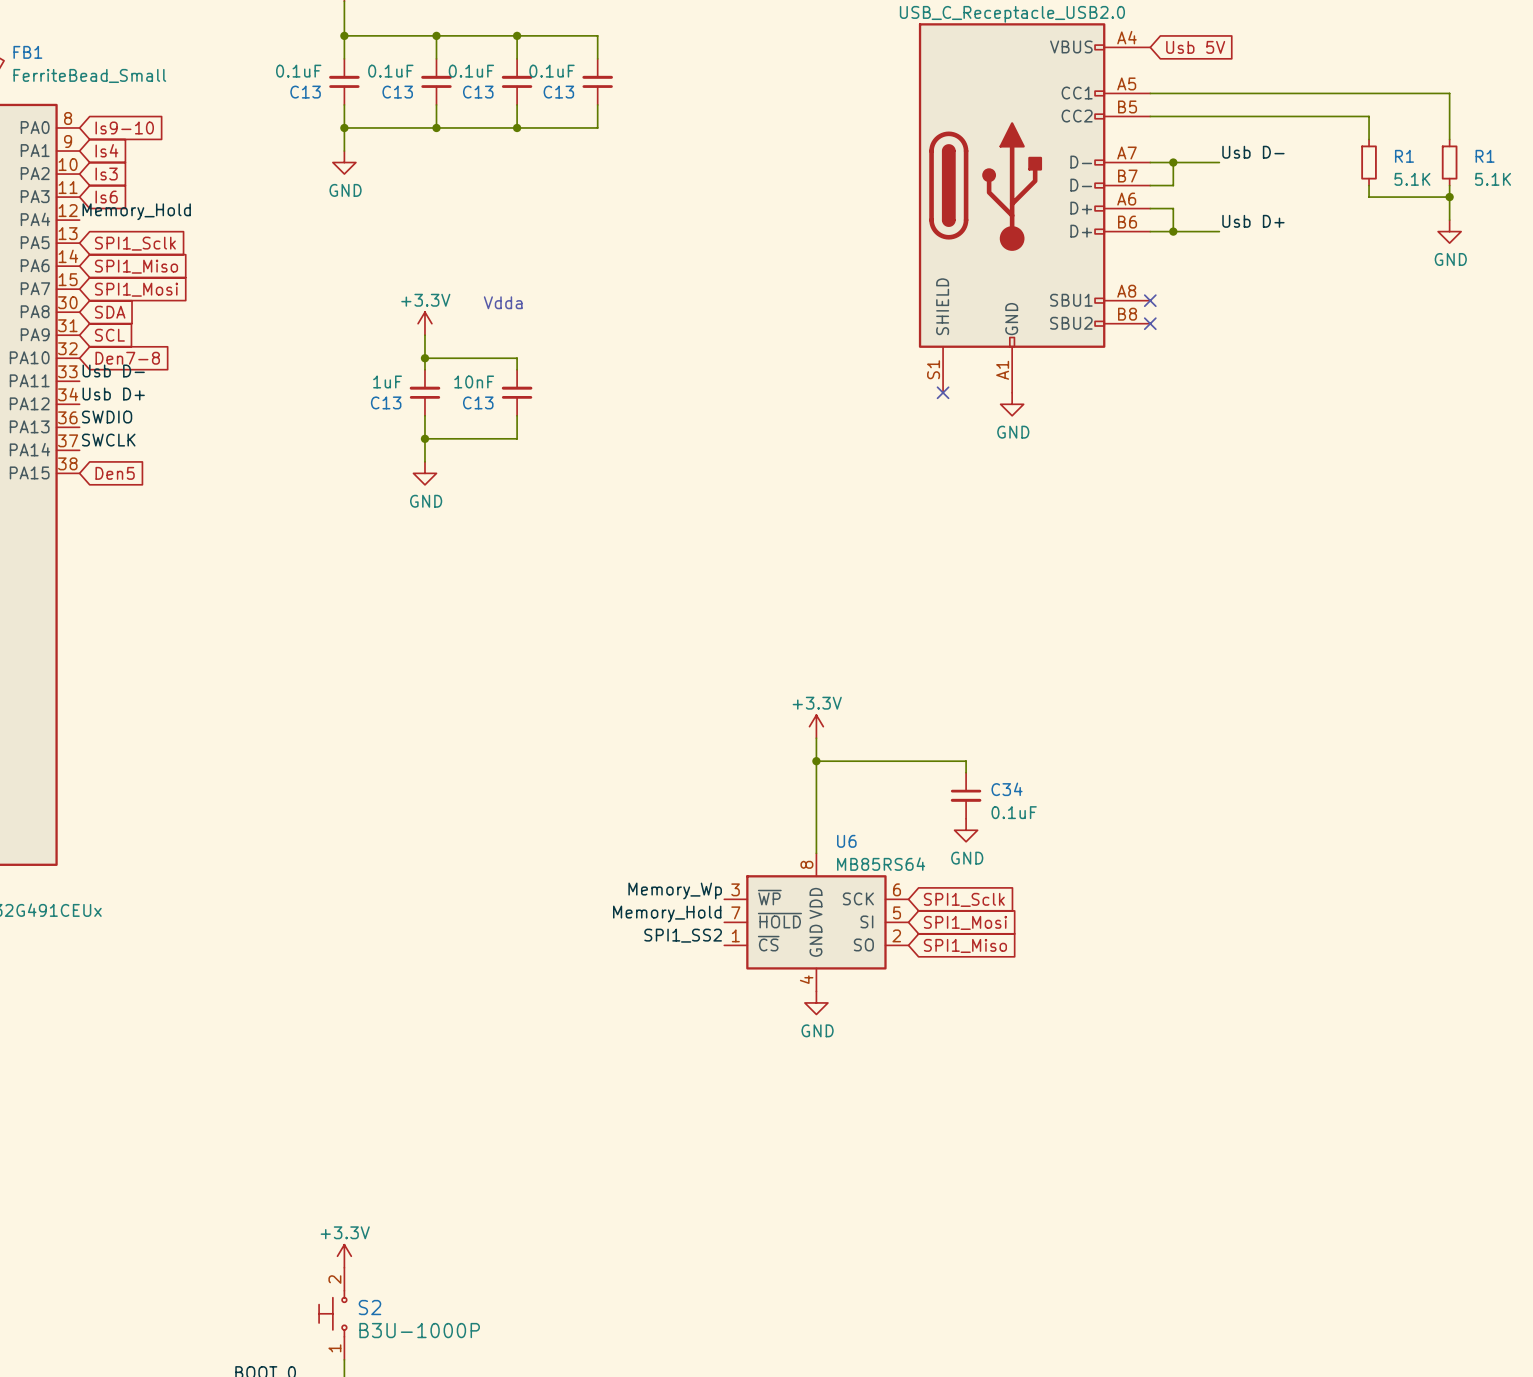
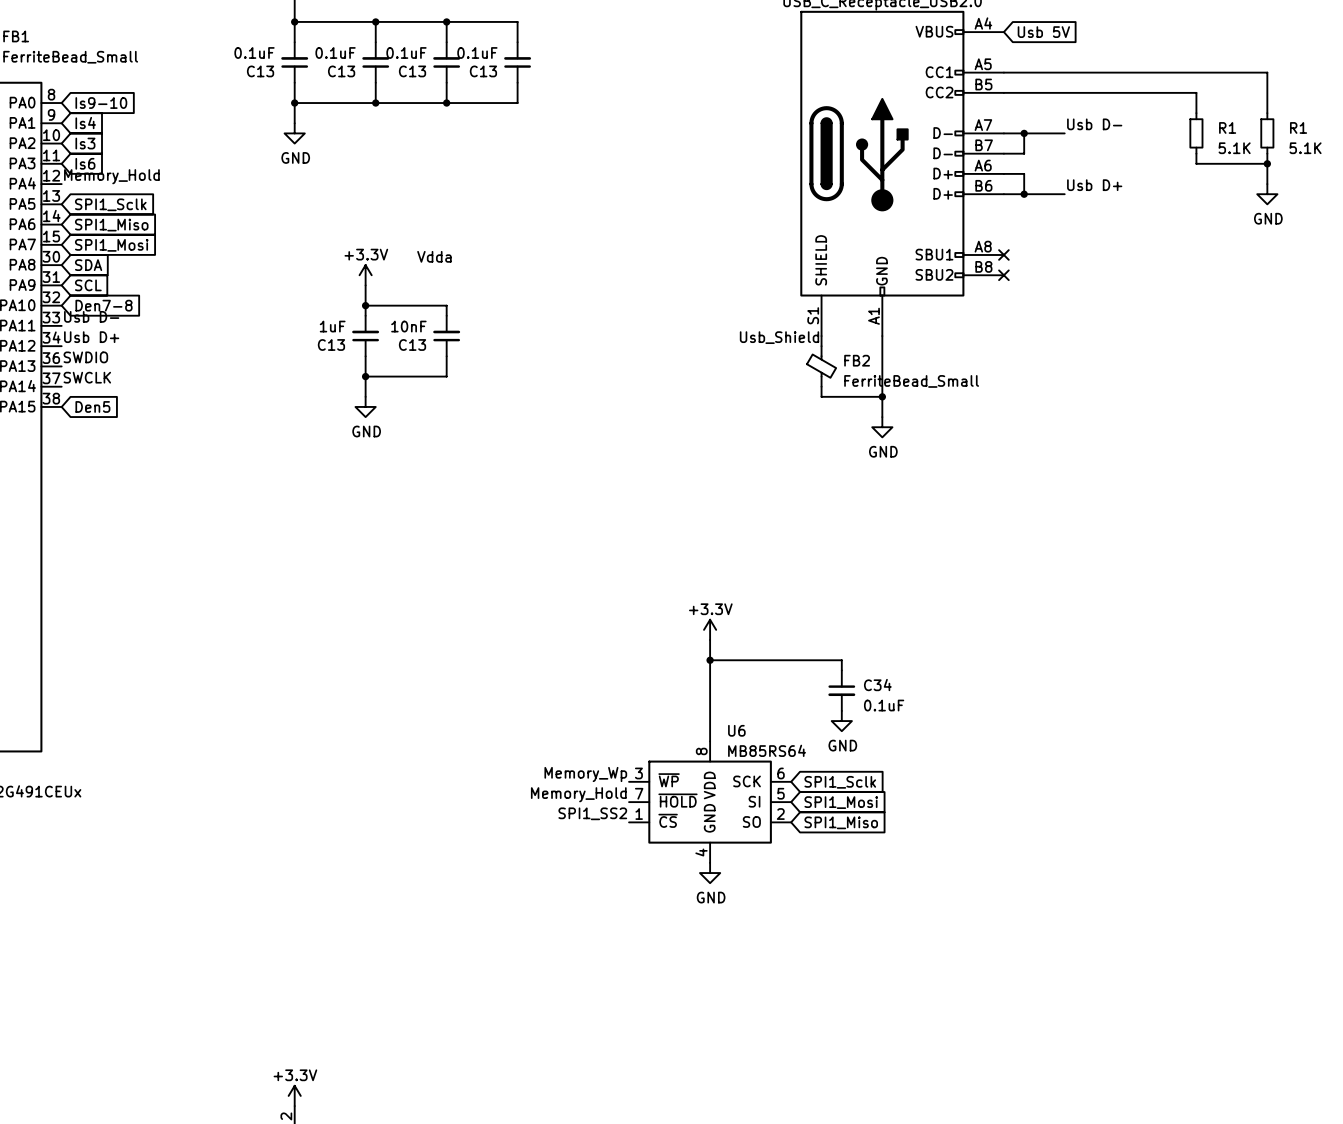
wire: none -> (821, 336) (821, 346)
no-connect mark: (943, 392) -> none
wire: none -> (882, 336) (882, 417)
label: none -> Usb_Shield (779, 337)
power symbol position: GND (1012, 404) -> GND (882, 427)
FB2: none -> FerriteBead_Small (821, 366)
wire: none -> (821, 386) (821, 396) (882, 396)
junction: none -> (882, 396)

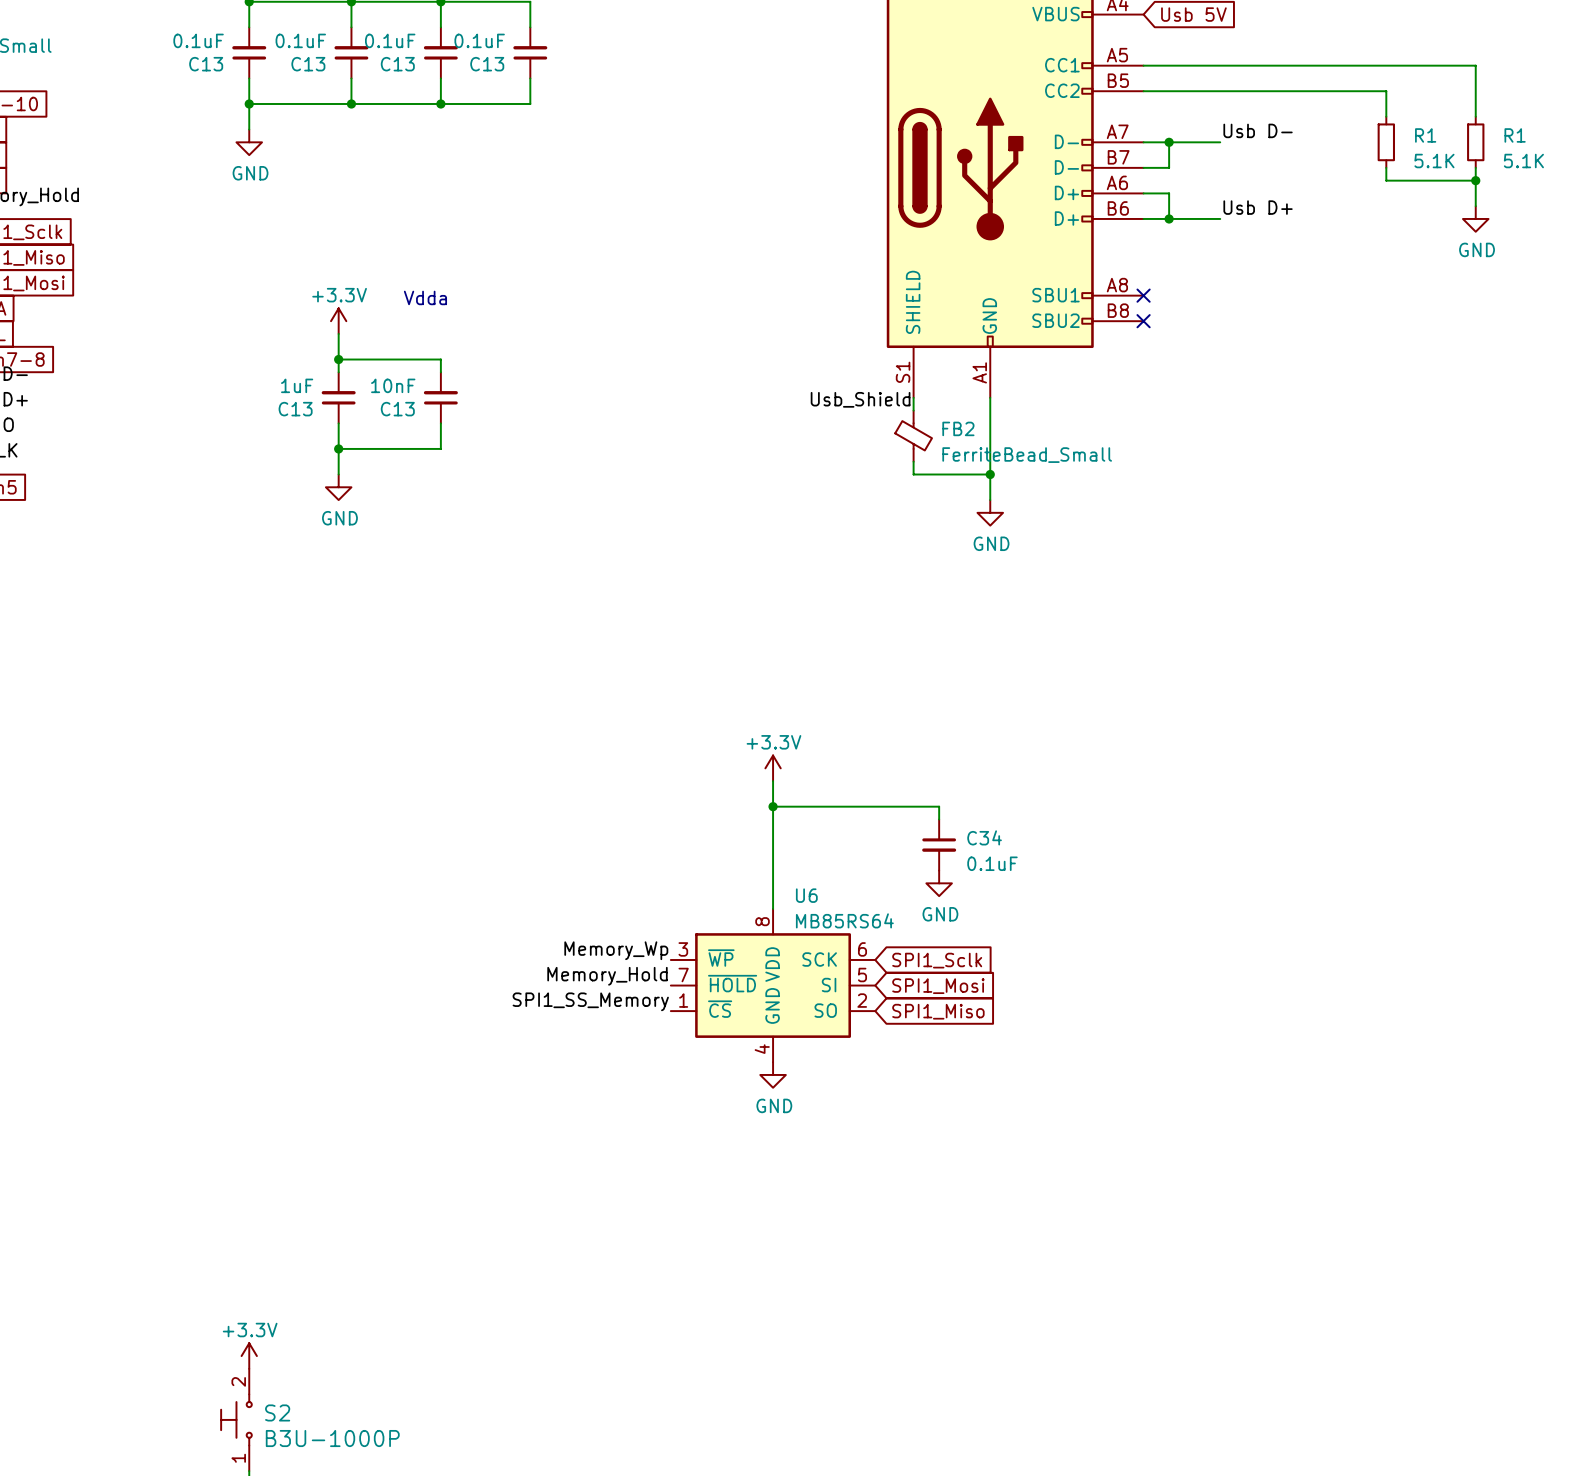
label: SPI1_SS2 (592, 813) -> SPI1_SS_Memory (590, 1001)

